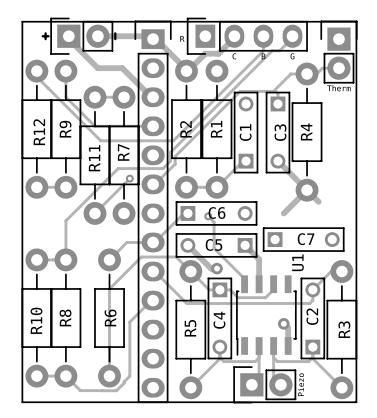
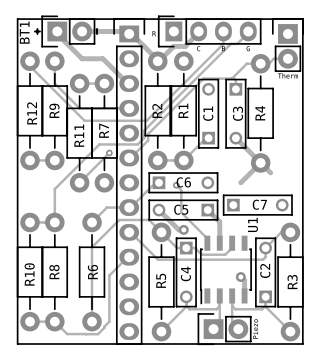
BT1 name: none -> BT1 (24, 32)

